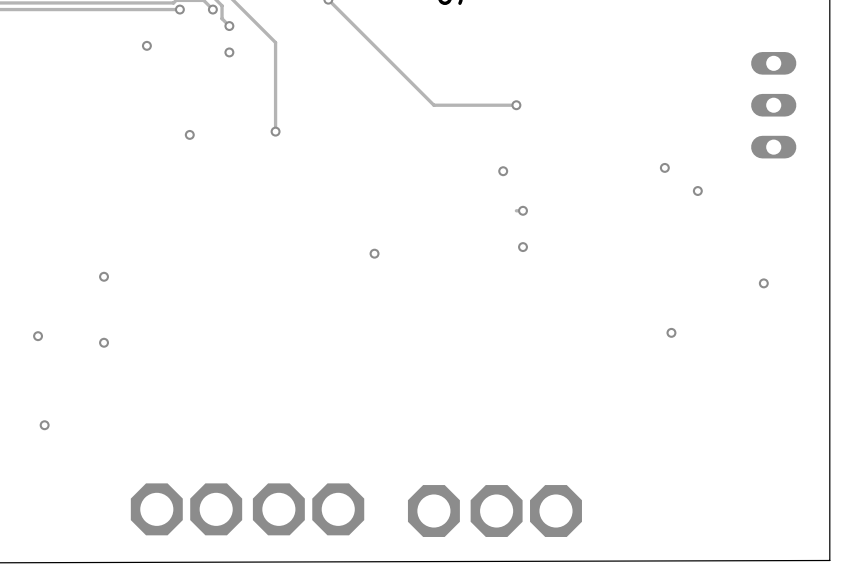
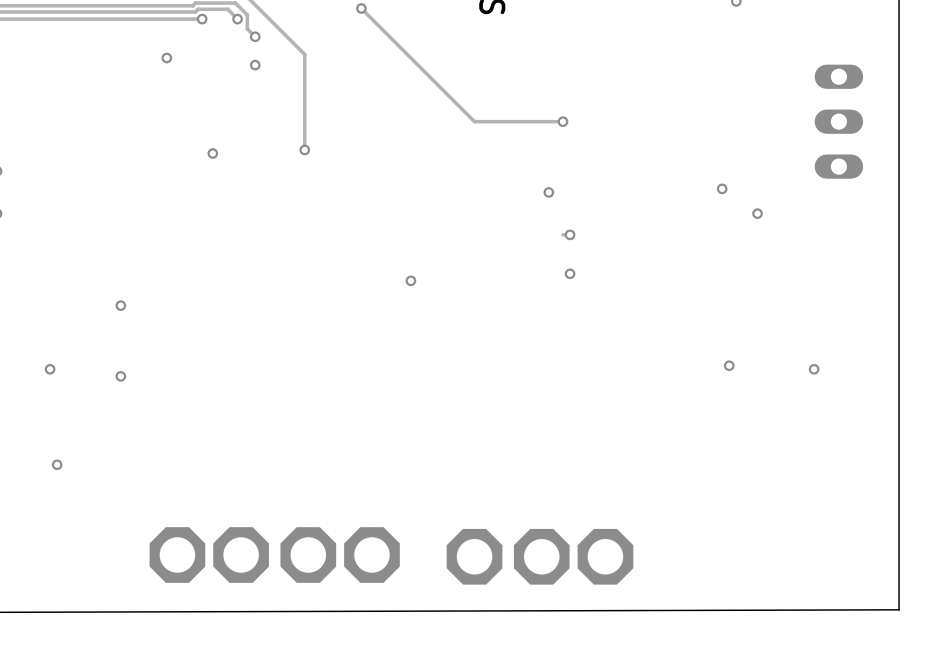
via position: (763, 283) -> (814, 369)

